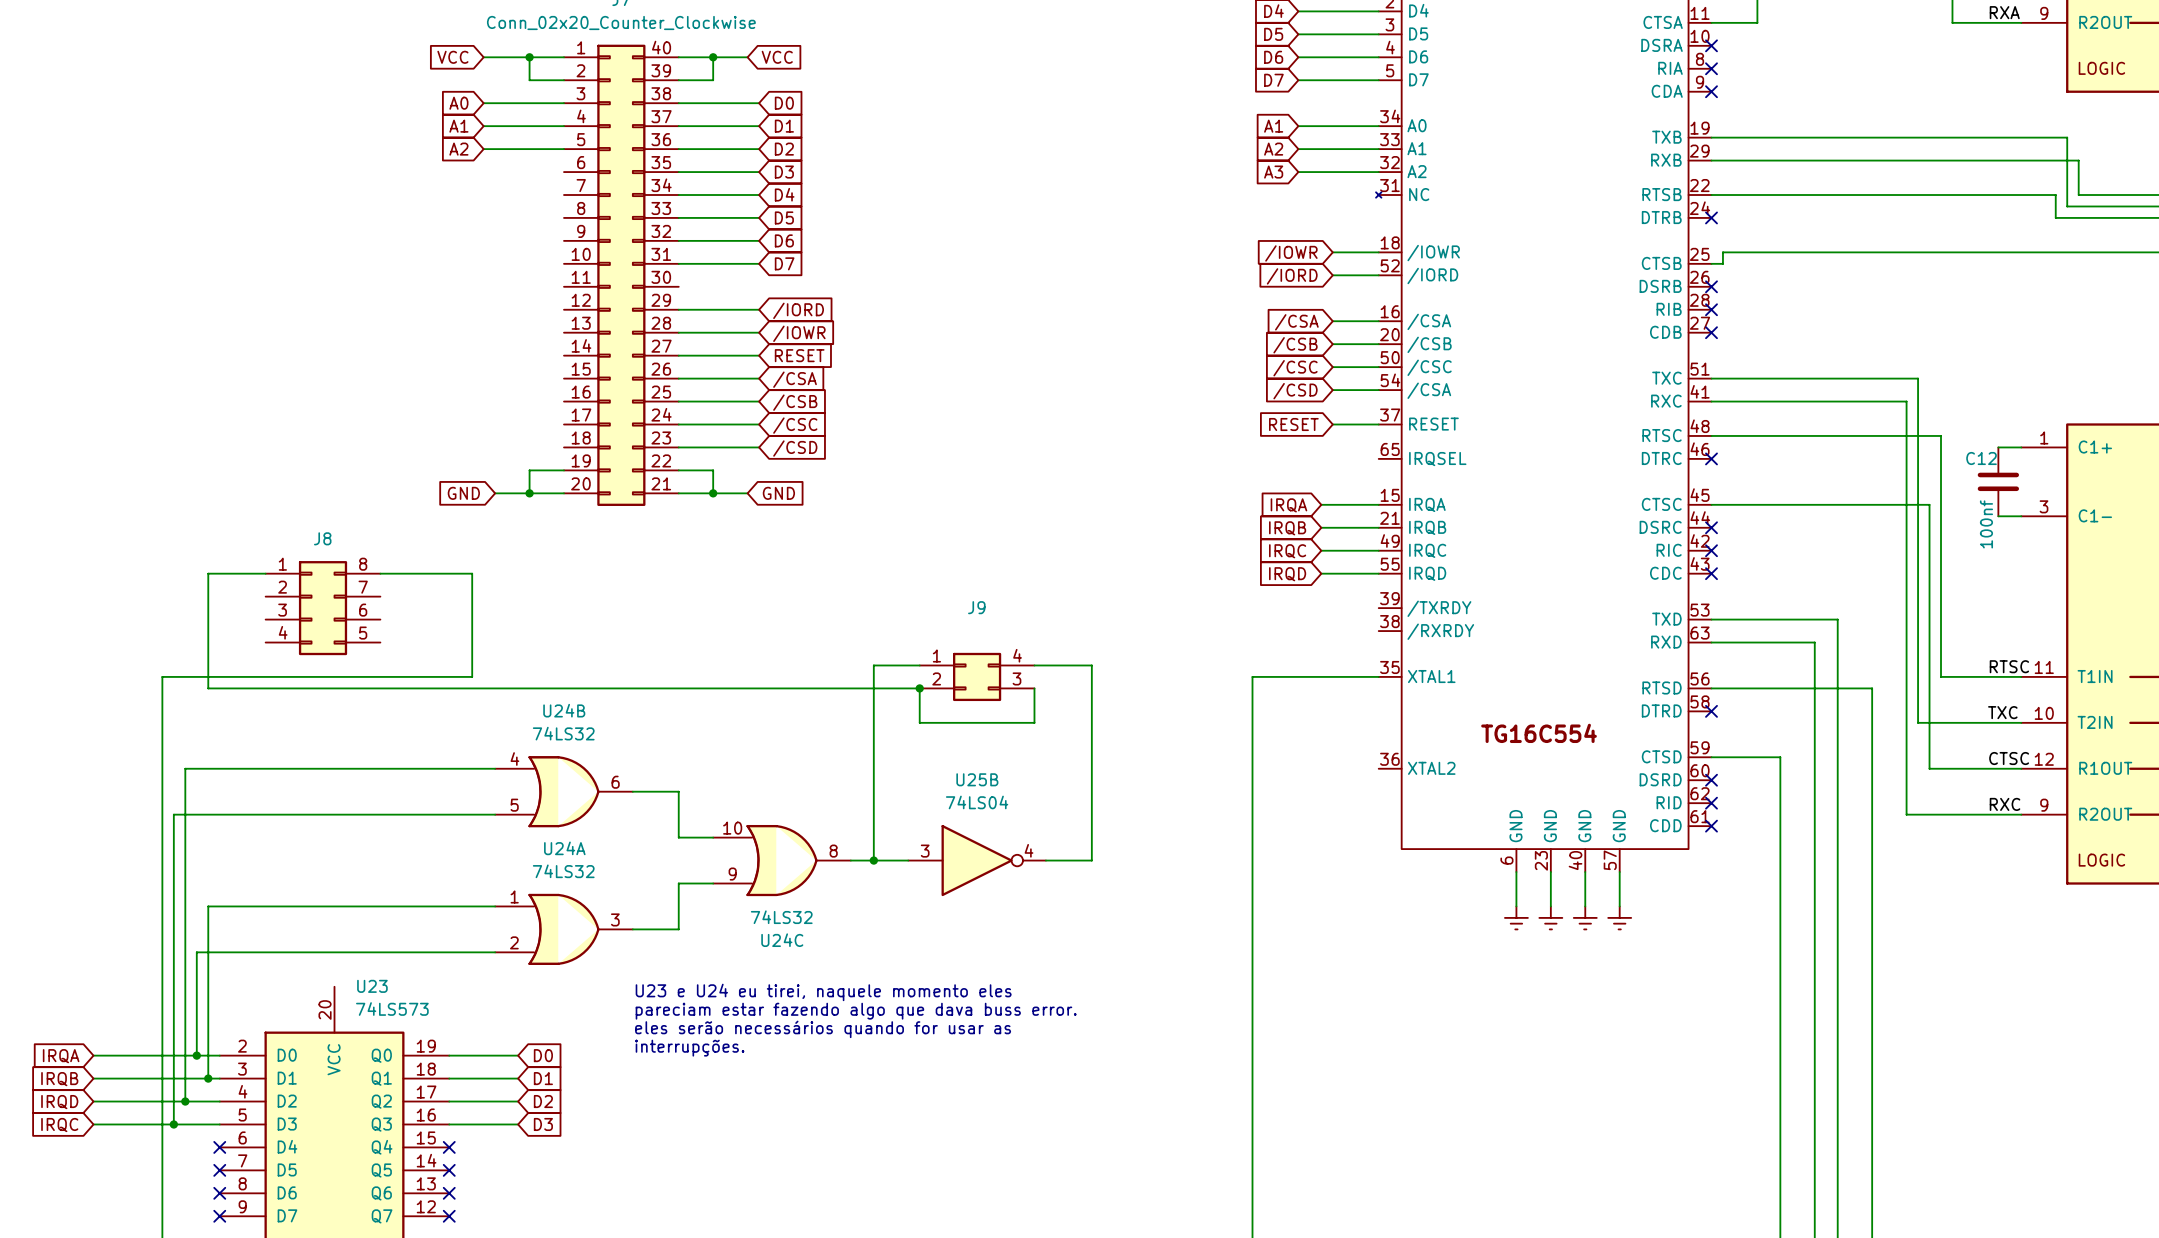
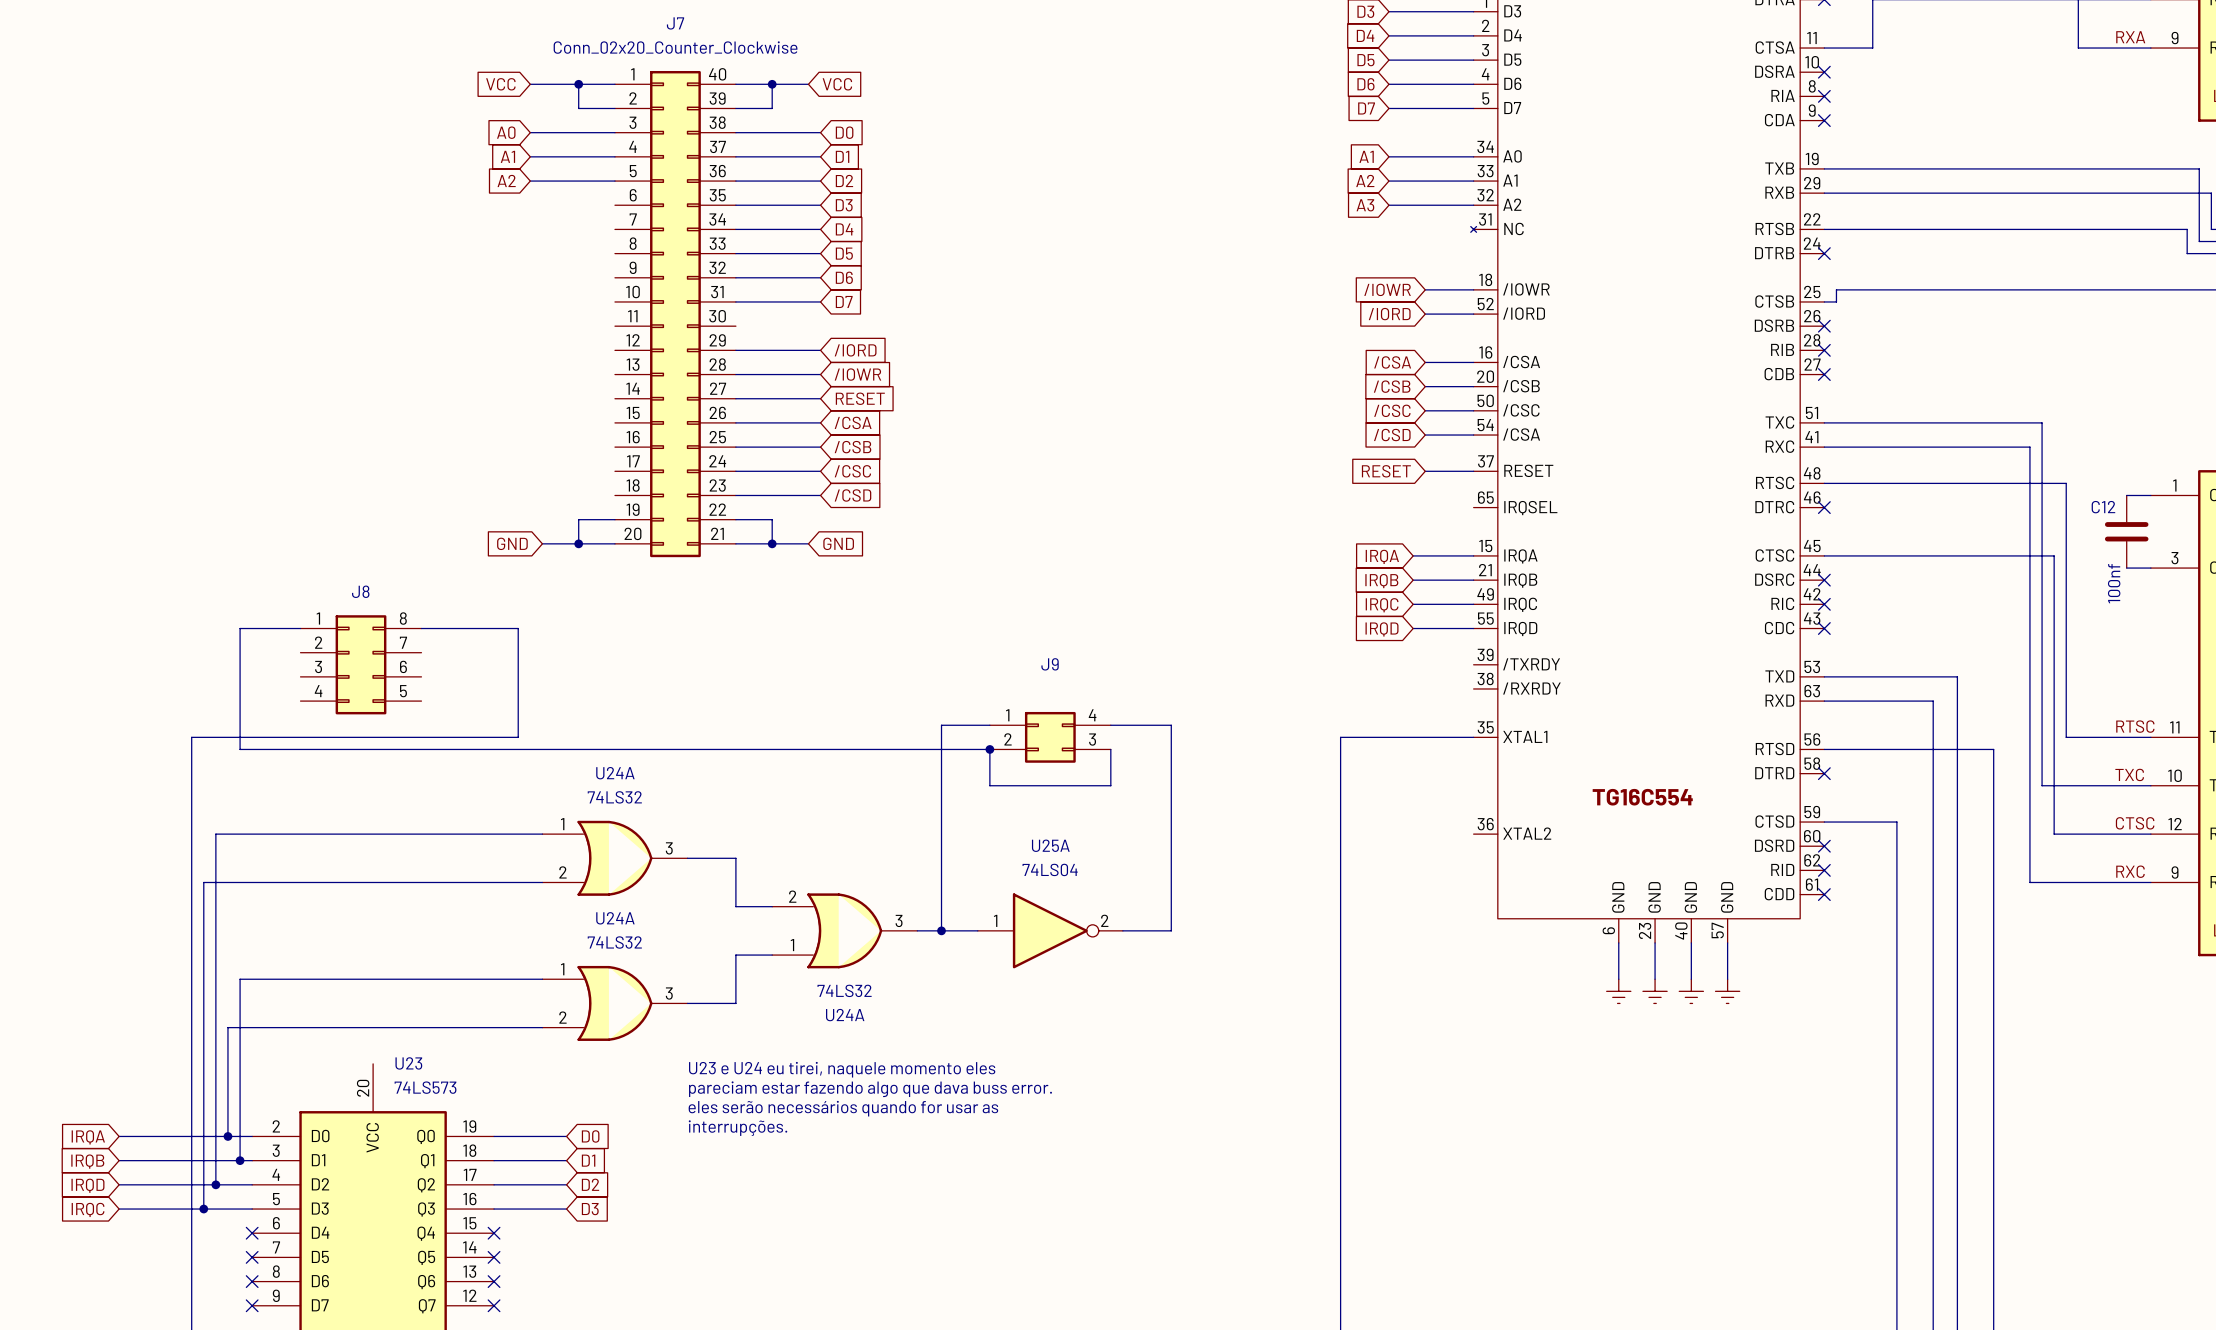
U24B name: U24B (564, 710) -> U24A (615, 773)
U24B pin number: 4 (514, 759) -> 1 (562, 824)
U25B name: U25B (977, 779) -> U25A (1050, 845)
U24B pin number: 6 (615, 782) -> 3 (669, 848)
U24B pin number: 5 (514, 805) -> 2 (562, 872)
U24C pin number: 10 (732, 828) -> 2 (792, 896)
U25B pin number: 4 (1029, 850) -> 2 (1104, 920)
U24C pin number: 8 (833, 851) -> 3 (899, 920)
U25B pin number: 3 (925, 851) -> 1 (995, 920)
U24C pin number: 9 (732, 874) -> 1 (792, 945)
U24C name: U24C (782, 940) -> U24A (845, 1015)

